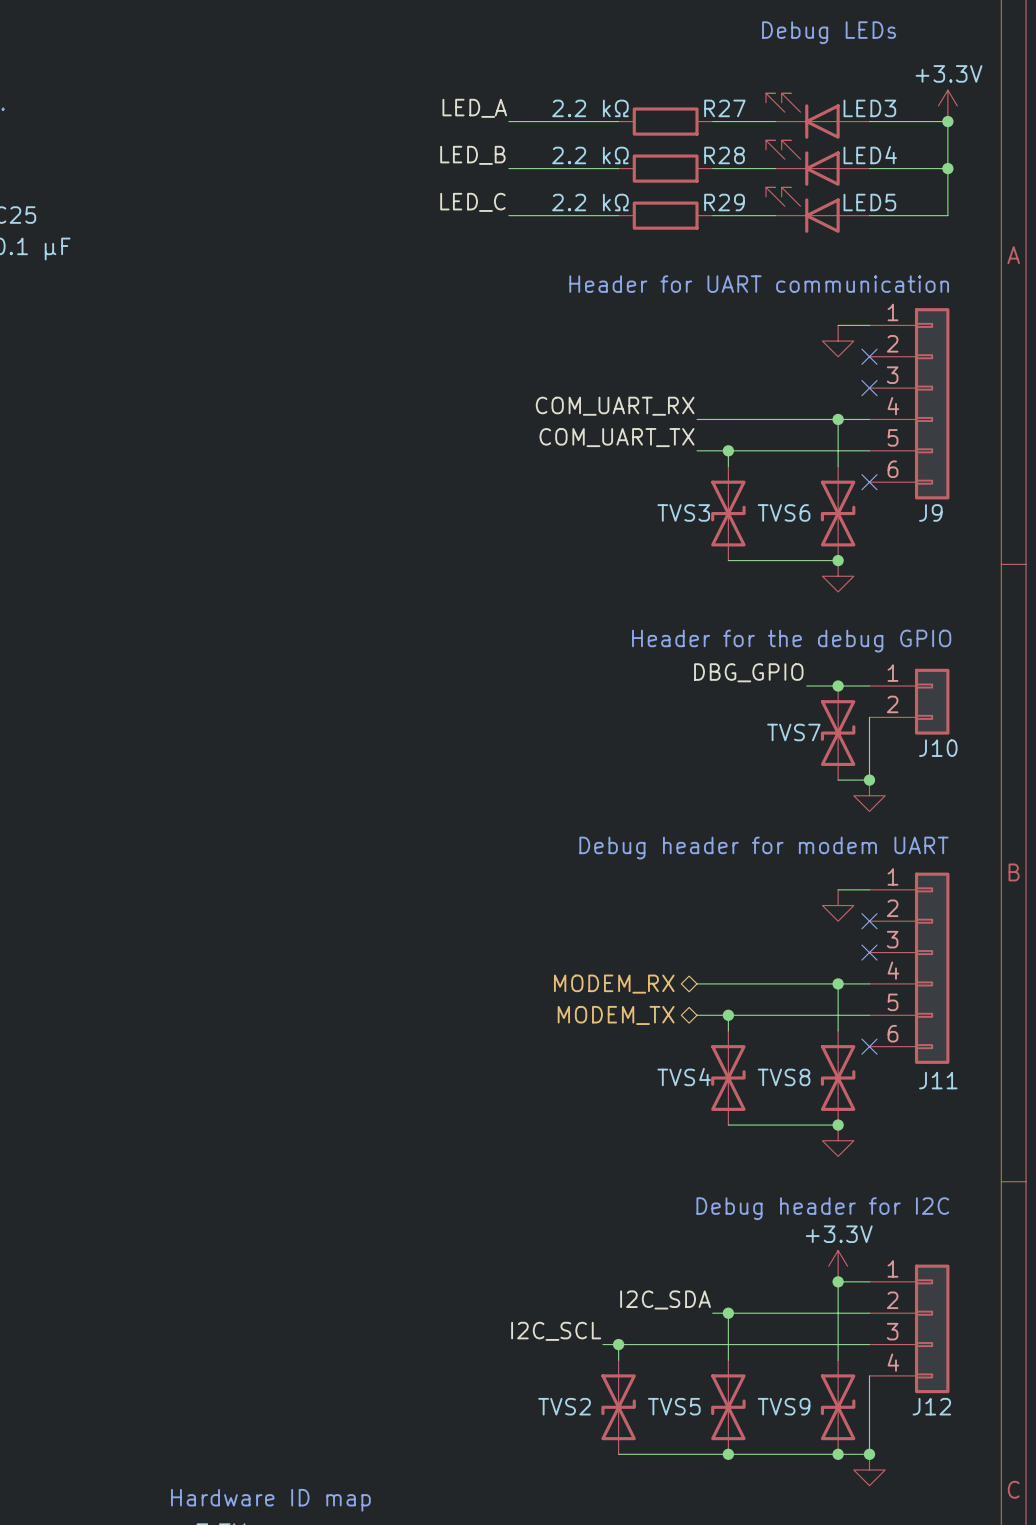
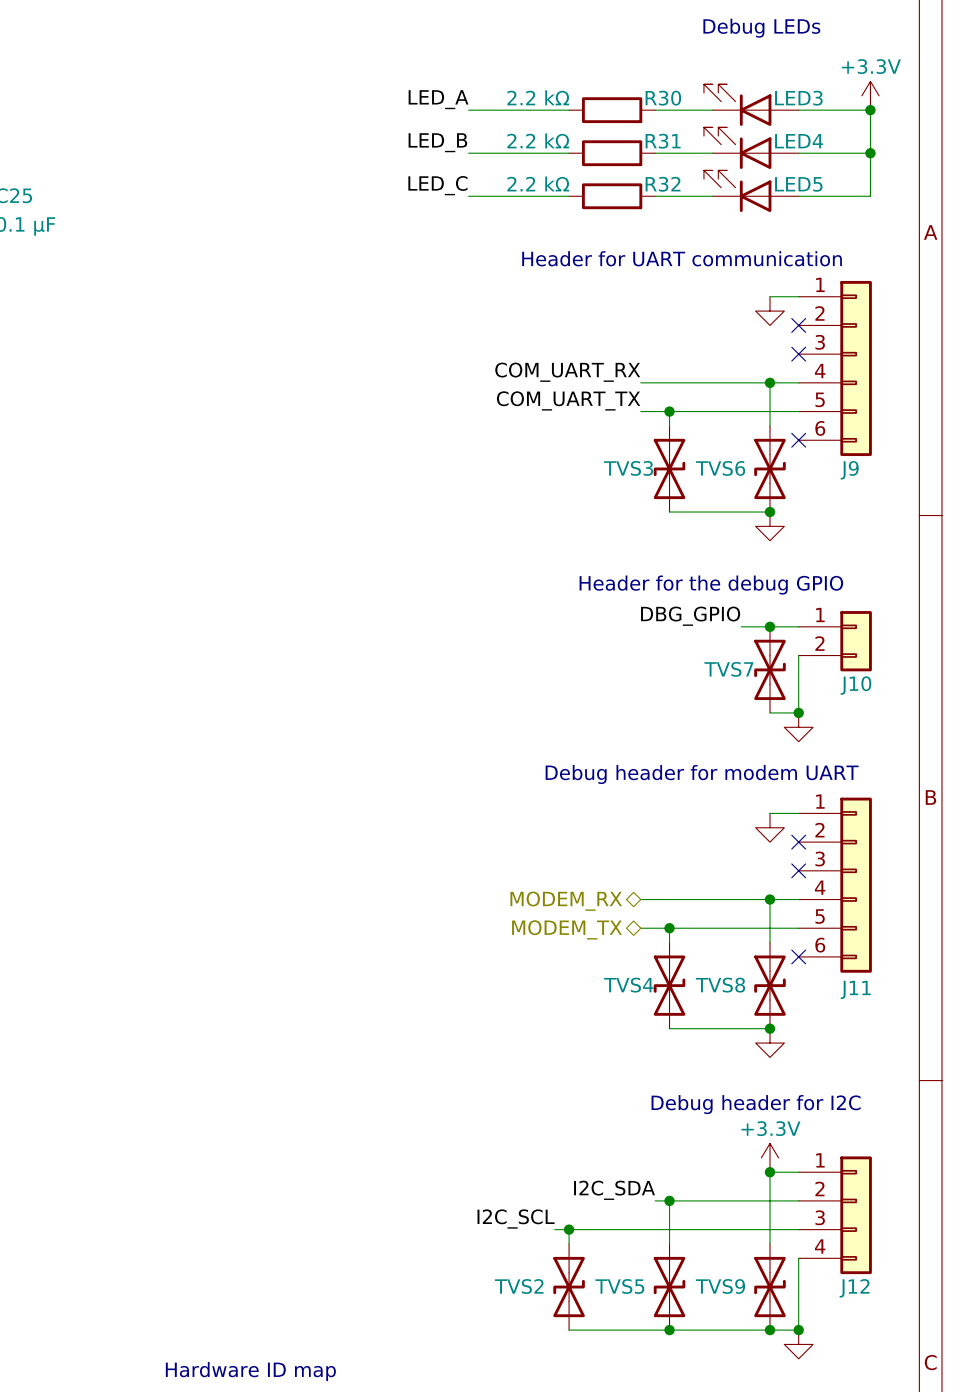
R27 name: R27 (724, 108) -> R30 (663, 98)
R28 name: R28 (724, 155) -> R31 (663, 141)
R29 name: R29 (724, 202) -> R32 (663, 184)

